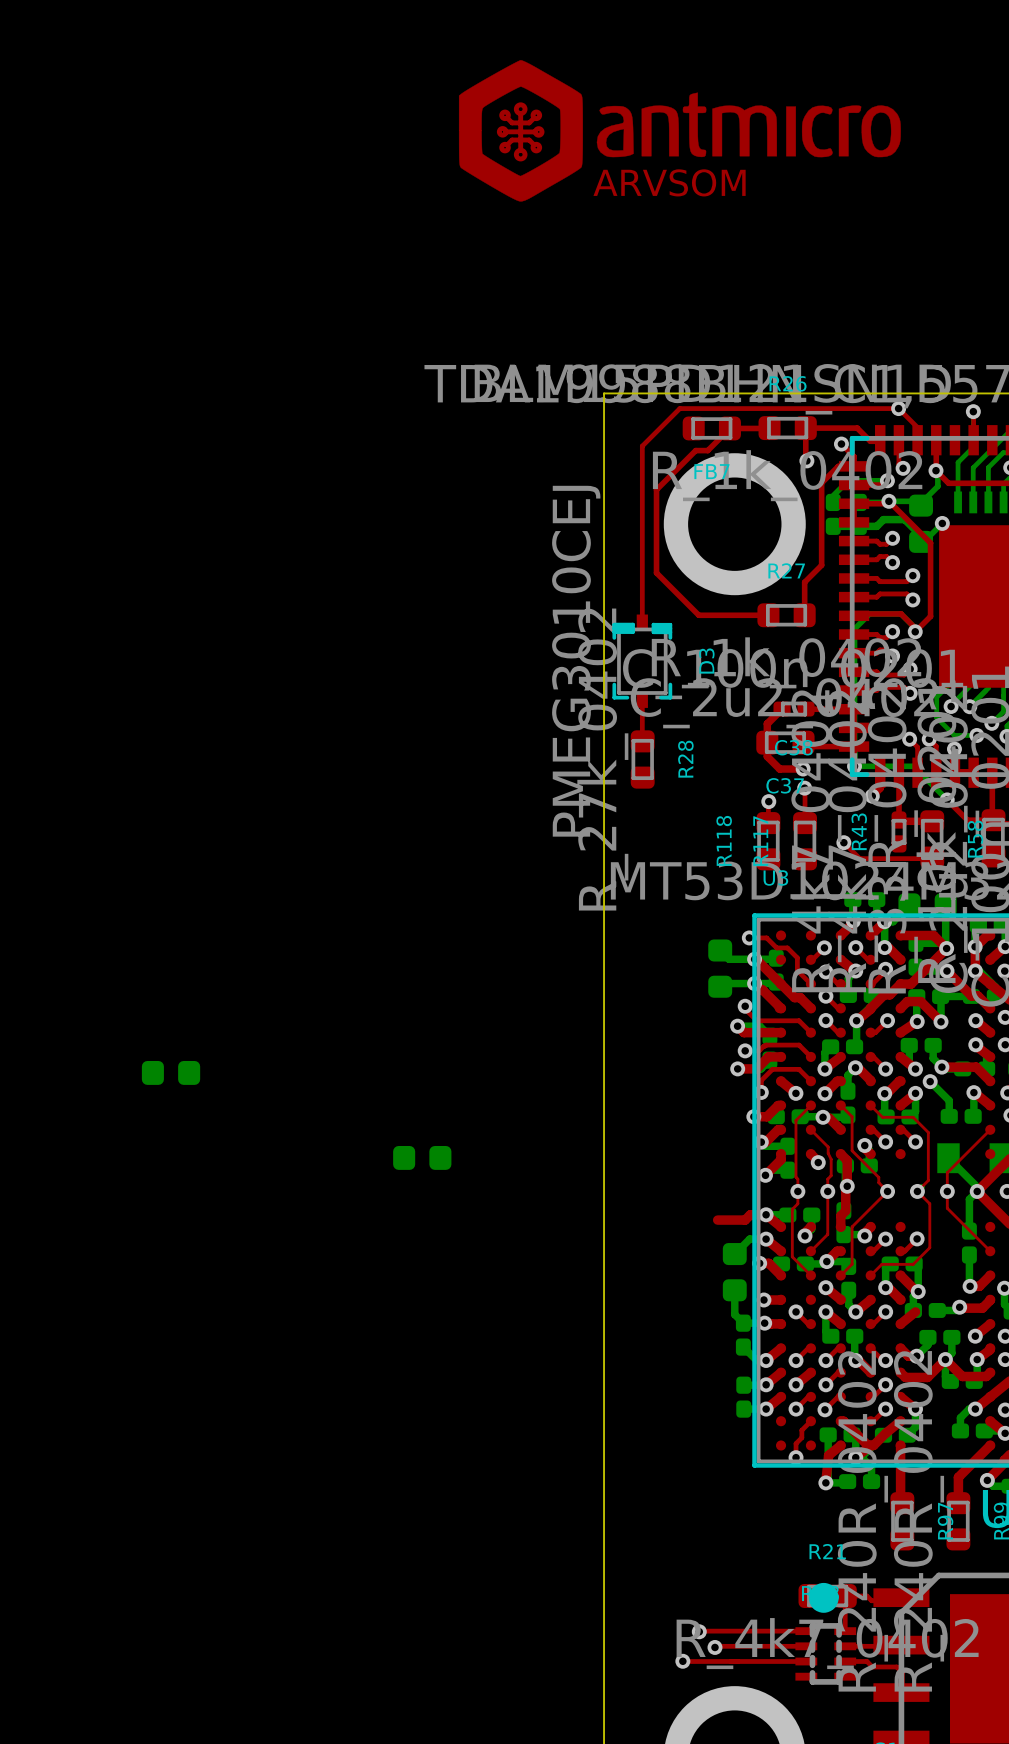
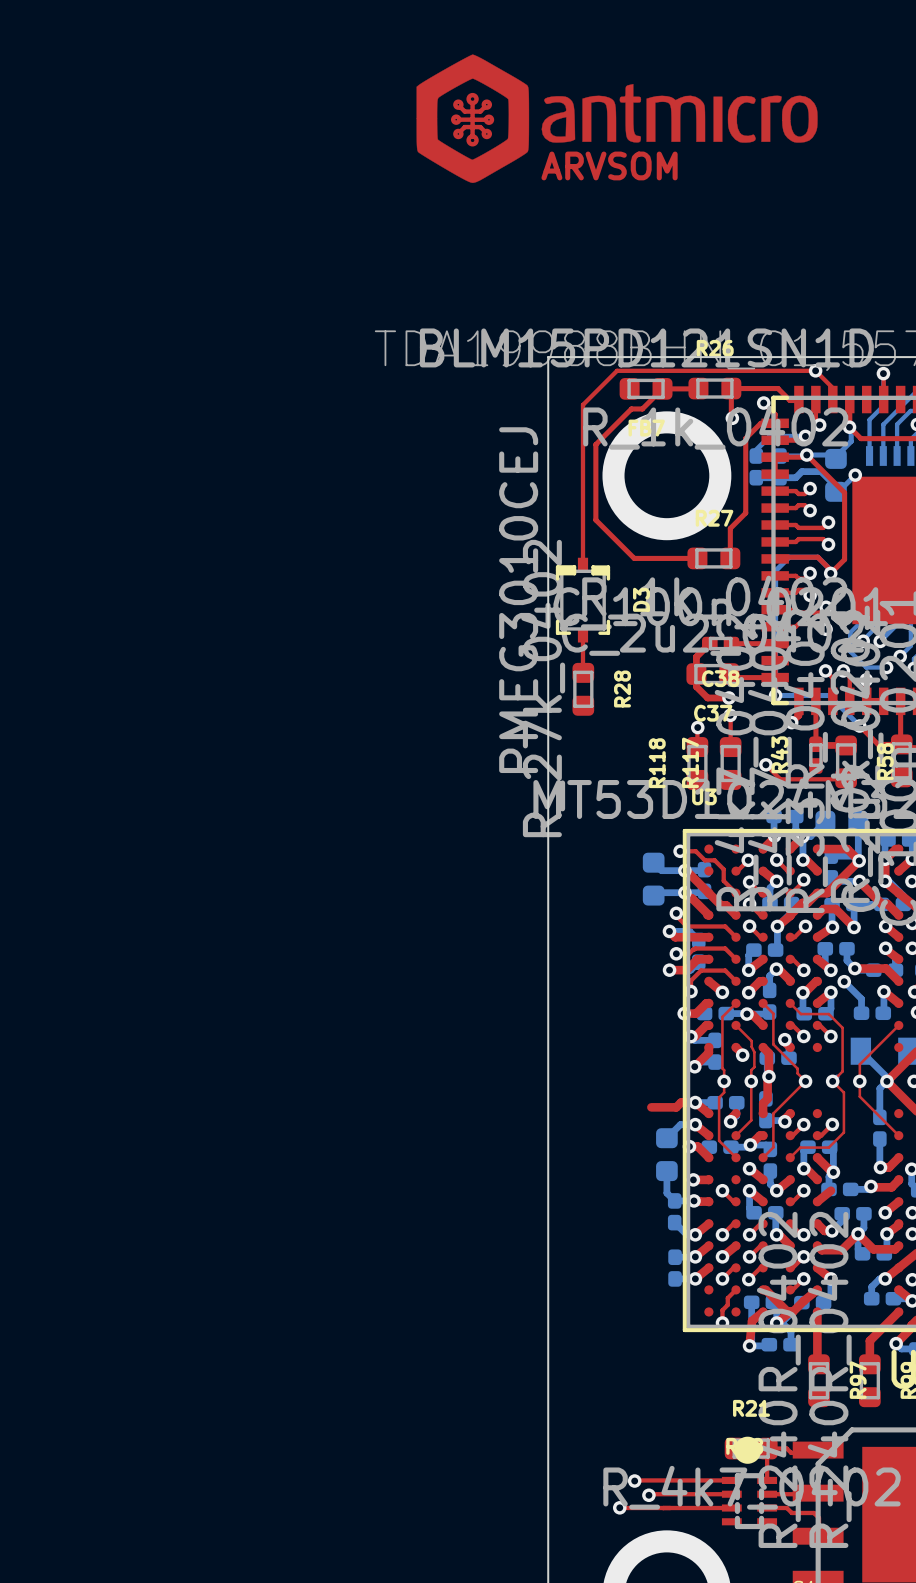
part: (171, 1072) -> none
part: (422, 1157) -> none

